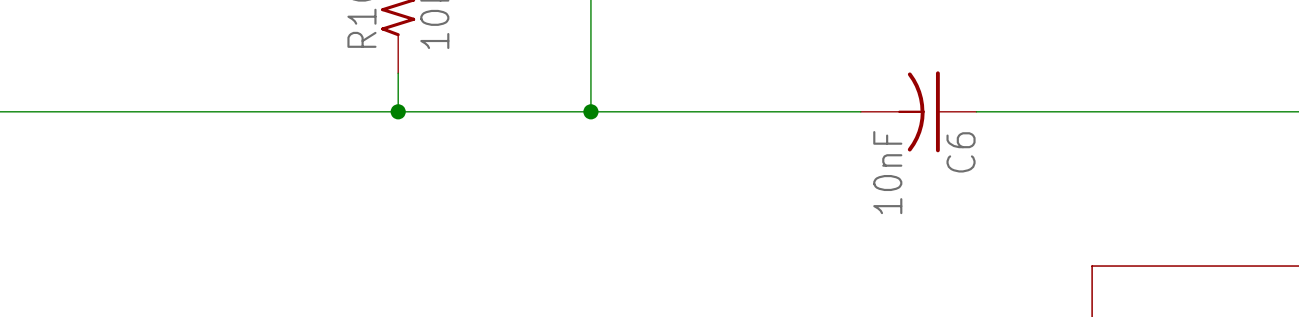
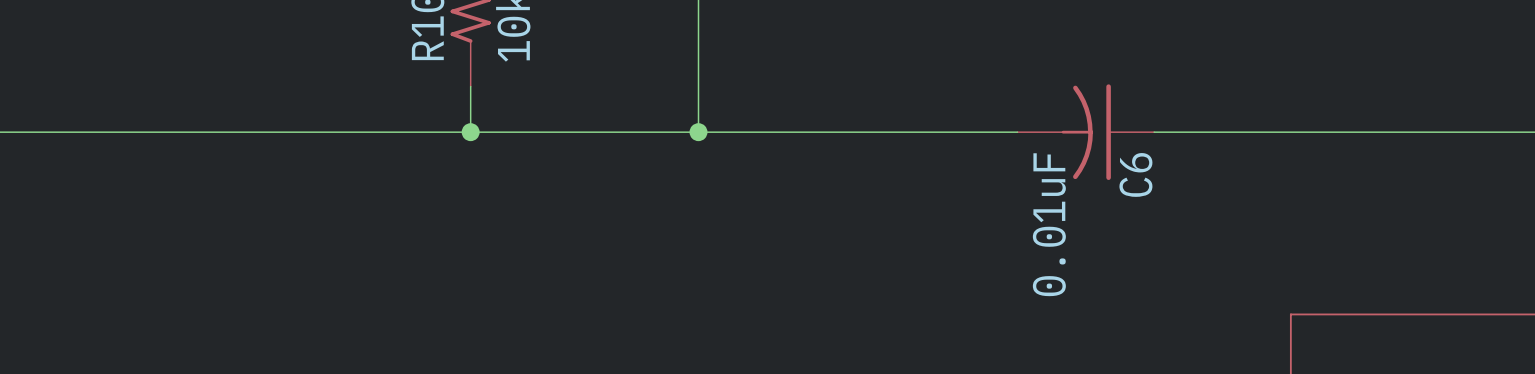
C6 value: 10nF (887, 172) -> 0.01uF (1049, 224)

